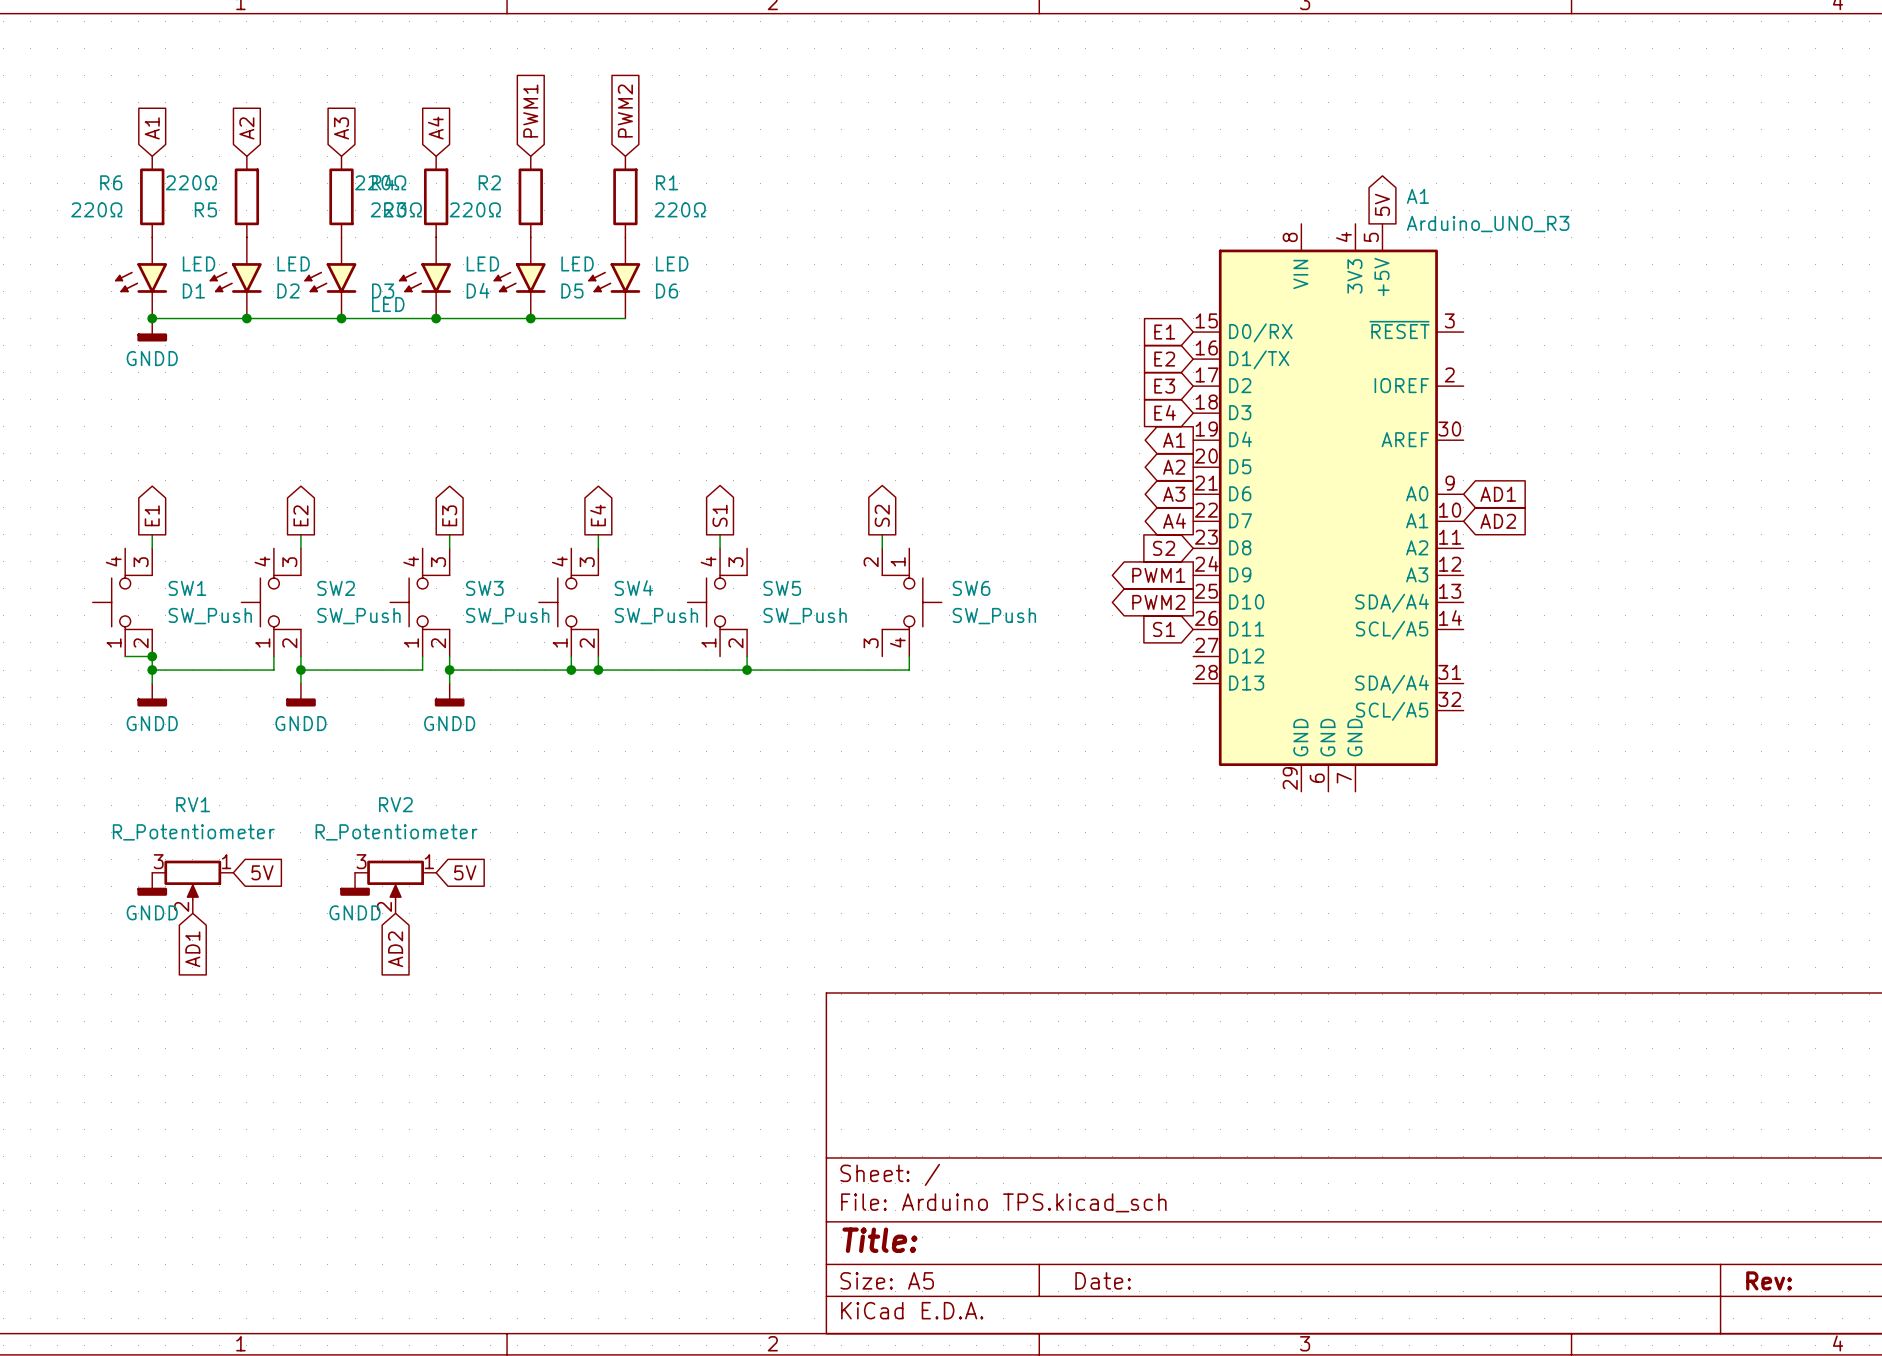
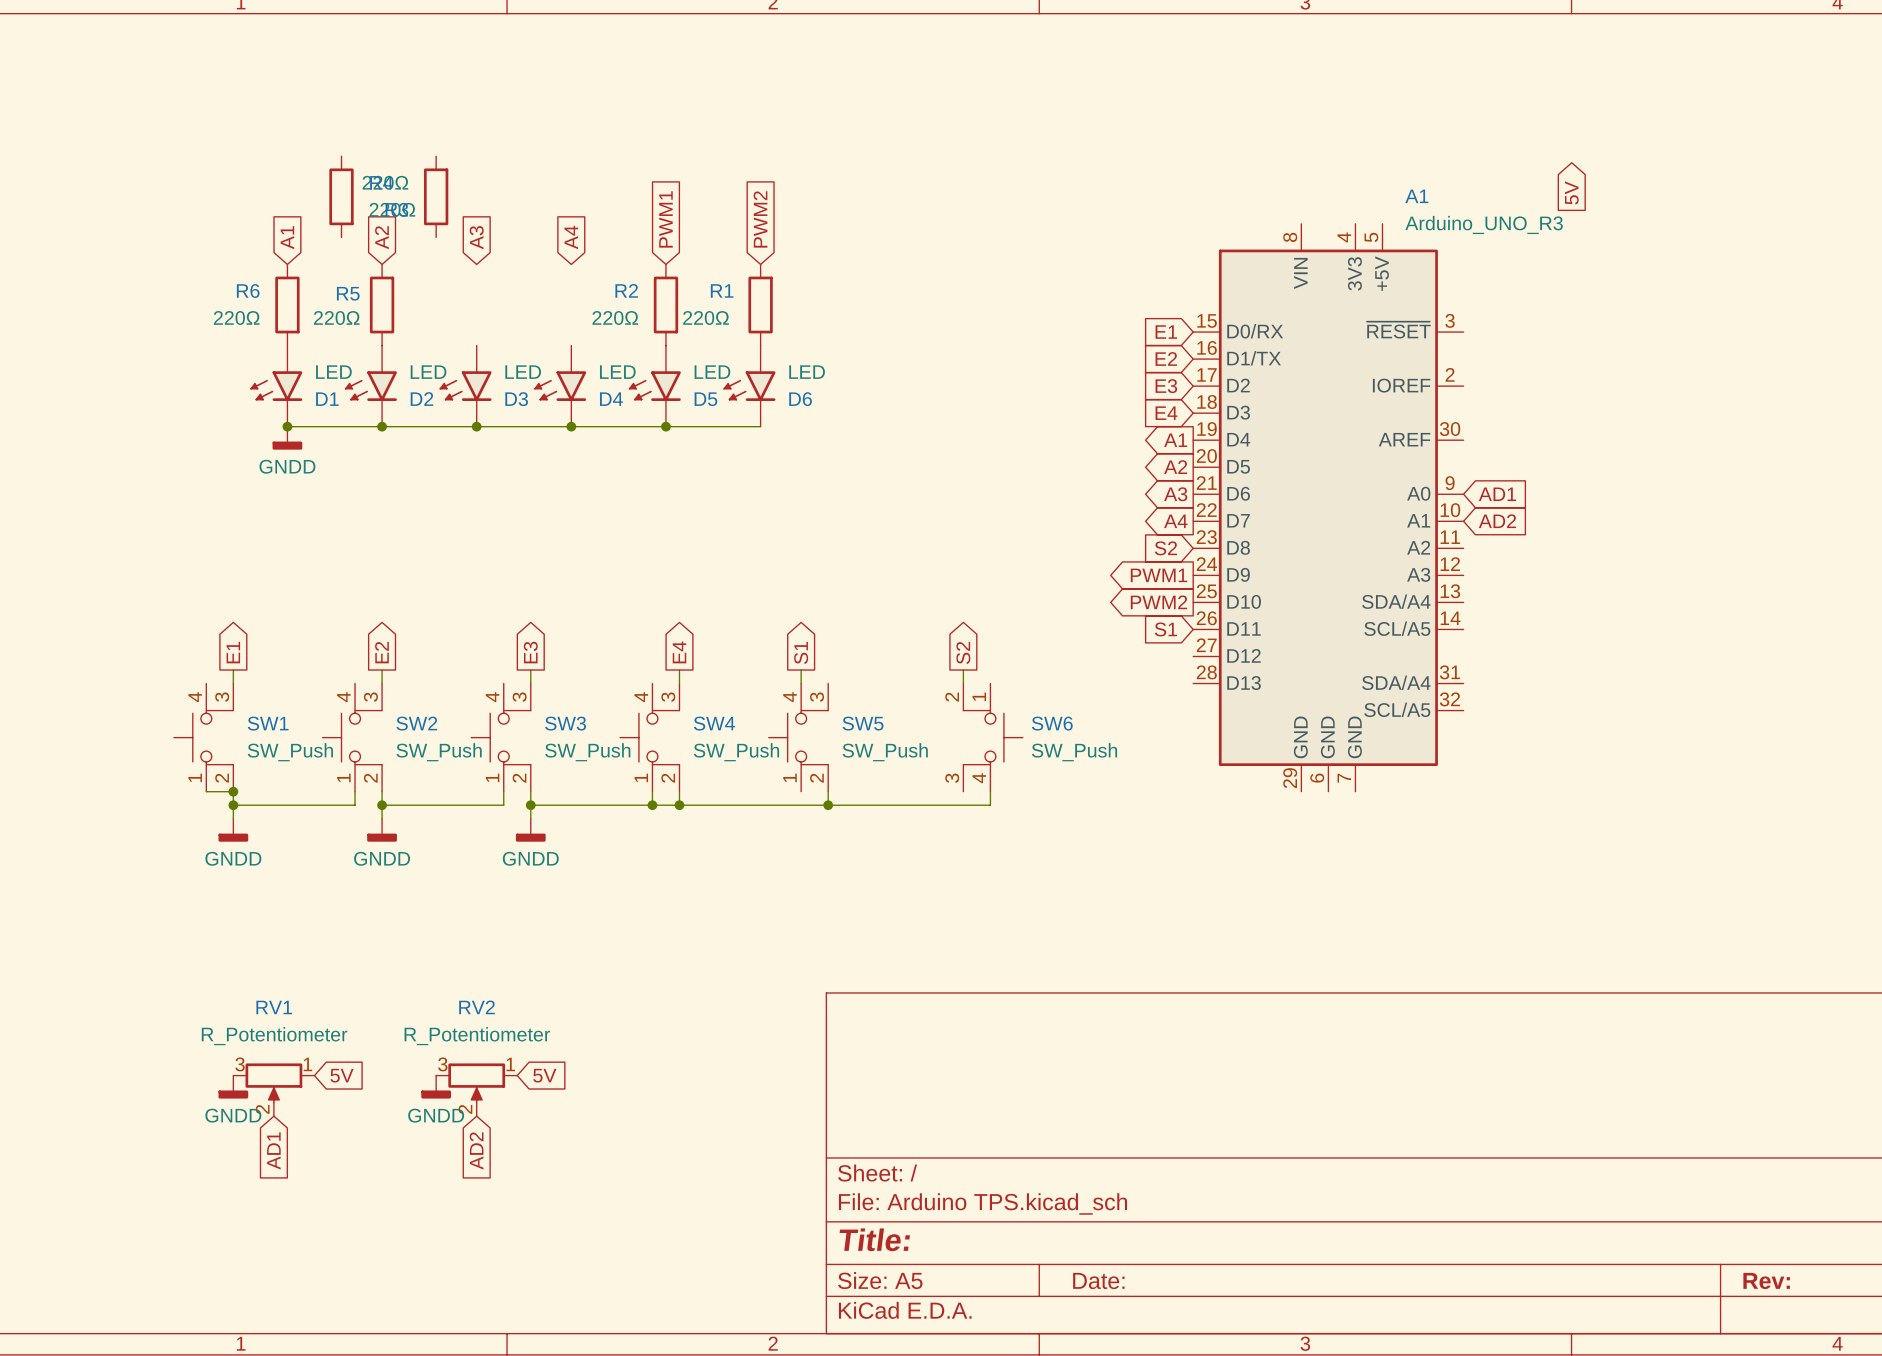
global label position: PWM1 (530, 111) -> PWM1 (665, 219)
global label position: PWM2 (625, 111) -> PWM2 (760, 219)
global label position: A1 (152, 128) -> A1 (287, 237)
global label position: A2 (246, 128) -> A2 (381, 237)
global label position: A3 (341, 128) -> A3 (476, 237)
global label position: A4 (435, 128) -> A4 (571, 237)
R5 value position: 220Ω (191, 182) -> 220Ω (336, 318)
R1 name position: R1 (667, 182) -> R1 (722, 290)
R6 position: (152, 196) -> (287, 305)
R5 position: (246, 196) -> (382, 305)
R2 position: (530, 196) -> (665, 305)
R1 position: (625, 196) -> (760, 305)
global label position: 5V (1382, 204) -> 5V (1571, 192)
R5 name position: R5 (205, 209) -> R5 (348, 293)
R1 value position: 220Ω (680, 209) -> 220Ω (705, 318)
D1 position: (141, 277) -> (276, 386)
D2 position: (235, 277) -> (370, 386)
D3 position: (330, 277) -> (465, 386)
D4 position: (424, 277) -> (560, 386)
D5 position: (519, 277) -> (654, 386)
D6 position: (614, 277) -> (749, 386)
D3 value position: LED (388, 304) -> LED (523, 372)
wire: (152, 318) (625, 318) -> (287, 426) (760, 426)
junction: (152, 318) -> none
junction: (246, 318) -> none
junction: (341, 318) -> none
junction: (436, 318) -> none
junction: (530, 318) -> none
power symbol: GNDD (152, 330) -> none
junction: none -> (287, 426)
junction: none -> (382, 426)
junction: none -> (476, 426)
junction: none -> (571, 426)
junction: none -> (665, 426)
power symbol: none -> GNDD (287, 438)
global label position: E1 (152, 515) -> E1 (233, 652)
global label position: E2 (300, 515) -> E2 (381, 652)
global label position: E3 (449, 515) -> E3 (530, 652)
global label position: E4 (598, 515) -> E4 (679, 652)
global label position: S1 (720, 515) -> S1 (801, 652)
global label position: S2 (882, 515) -> S2 (963, 652)
wire: (152, 534) (152, 548) -> (233, 670) (233, 683)
wire: (300, 534) (300, 548) -> (382, 670) (382, 683)
wire: (449, 534) (449, 548) -> (530, 670) (530, 683)
wire: (598, 534) (598, 548) -> (679, 670) (679, 683)
wire: (720, 534) (720, 548) -> (801, 670) (801, 683)
wire: (882, 534) (882, 548) -> (963, 670) (963, 683)
SW1 position: (122, 602) -> (203, 737)
SW2 position: (271, 602) -> (352, 737)
SW3 position: (419, 602) -> (501, 737)
SW4 position: (568, 602) -> (649, 737)
SW5 position: (717, 602) -> (798, 737)
SW6 position: (912, 602) -> (993, 737)
wire: (125, 656) (152, 656) (152, 683) -> (206, 791) (233, 791) (233, 818)
junction: (152, 656) -> none
wire: (273, 656) (273, 670) (152, 670) -> (355, 791) (355, 805) (233, 805)
wire: (300, 656) (300, 683) -> (382, 791) (382, 818)
wire: (422, 656) (422, 670) (300, 670) -> (503, 791) (503, 805) (382, 805)
wire: (449, 656) (449, 683) -> (530, 791) (530, 818)
wire: (571, 656) (571, 670) -> (652, 791) (652, 805)
wire: (598, 656) (598, 670) -> (679, 791) (679, 805)
wire: (747, 656) (747, 670) -> (828, 791) (828, 805)
wire: (909, 656) (909, 670) (449, 670) -> (990, 791) (990, 805) (530, 805)
junction: (152, 670) -> none
junction: (300, 670) -> none
junction: (449, 670) -> none
junction: (571, 670) -> none
junction: (598, 670) -> none
junction: (747, 670) -> none
power symbol: GNDD (152, 695) -> none
power symbol: GNDD (300, 695) -> none
power symbol: GNDD (449, 695) -> none
junction: none -> (233, 791)
junction: none -> (233, 805)
junction: none -> (382, 805)
junction: none -> (530, 805)
junction: none -> (652, 805)
junction: none -> (679, 805)
junction: none -> (828, 805)
power symbol: none -> GNDD (233, 830)
power symbol: none -> GNDD (530, 830)
global label: 5V (262, 872) -> none
global label: 5V (465, 872) -> none
power symbol: GNDD (152, 884) -> none
power symbol position: GNDD (355, 884) -> GNDD (382, 830)
RV1 position: (192, 887) -> (273, 1089)
RV2 position: (395, 887) -> (476, 1089)
global label position: AD1 (192, 949) -> AD1 (273, 1150)
global label position: AD2 (395, 949) -> AD2 (476, 1150)
global label: none -> 5V (342, 1075)
global label: none -> 5V (544, 1075)
power symbol: none -> GNDD (233, 1087)
power symbol: none -> GNDD (436, 1087)

